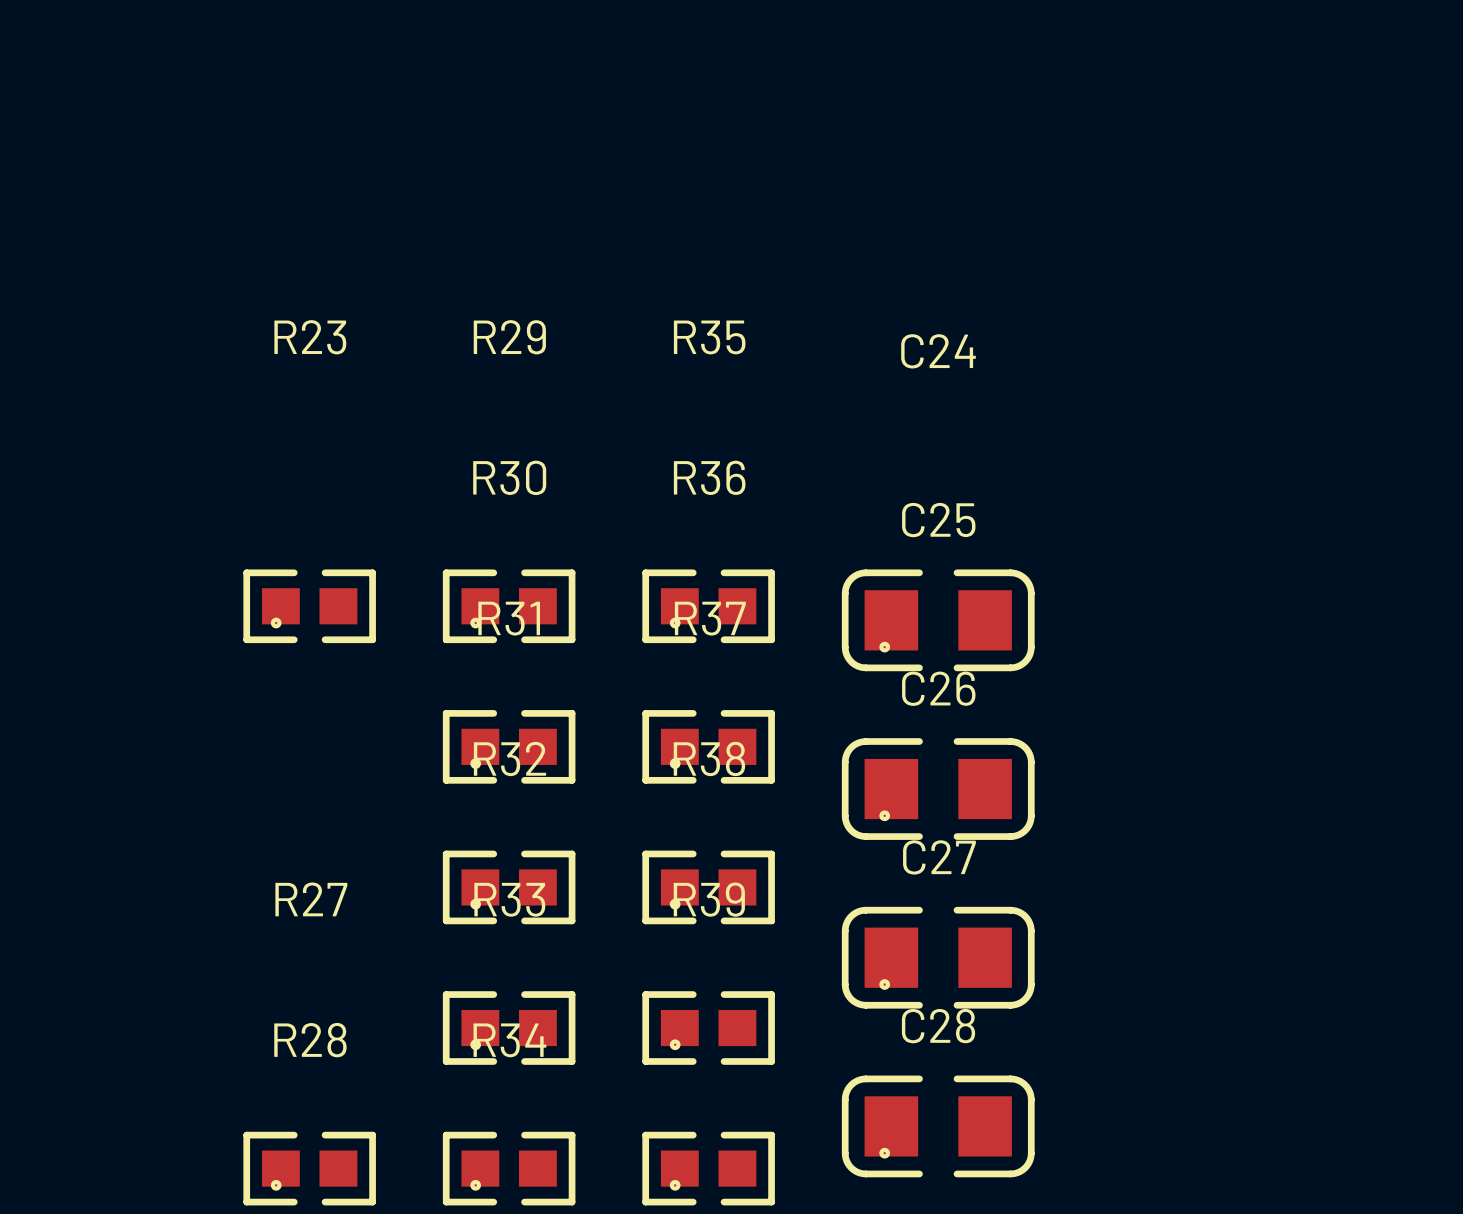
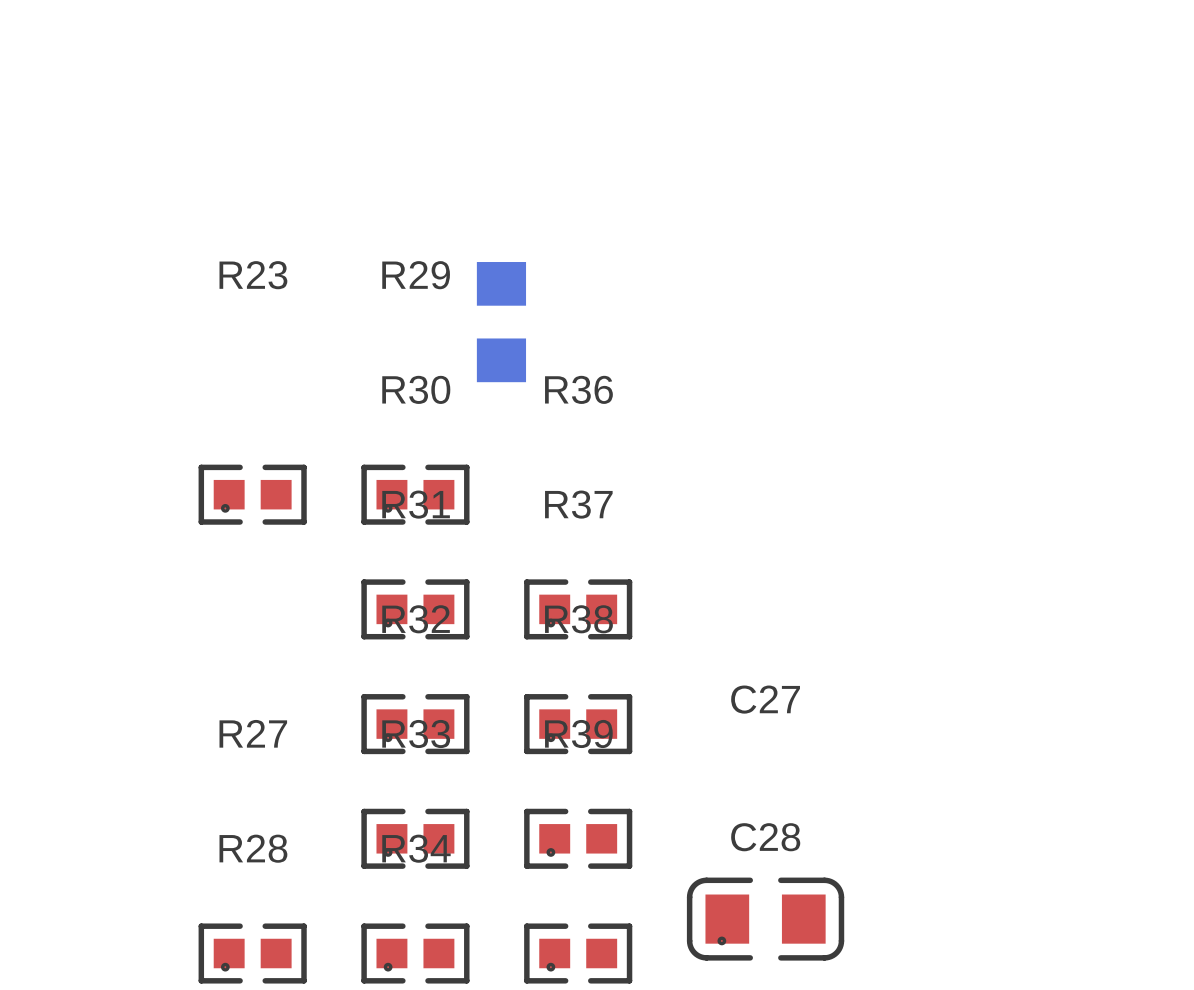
part: none -> (501, 322)
R35: (708, 606) -> none
C24: (938, 620) -> none
C25: (938, 789) -> none
C26: (938, 957) -> none

